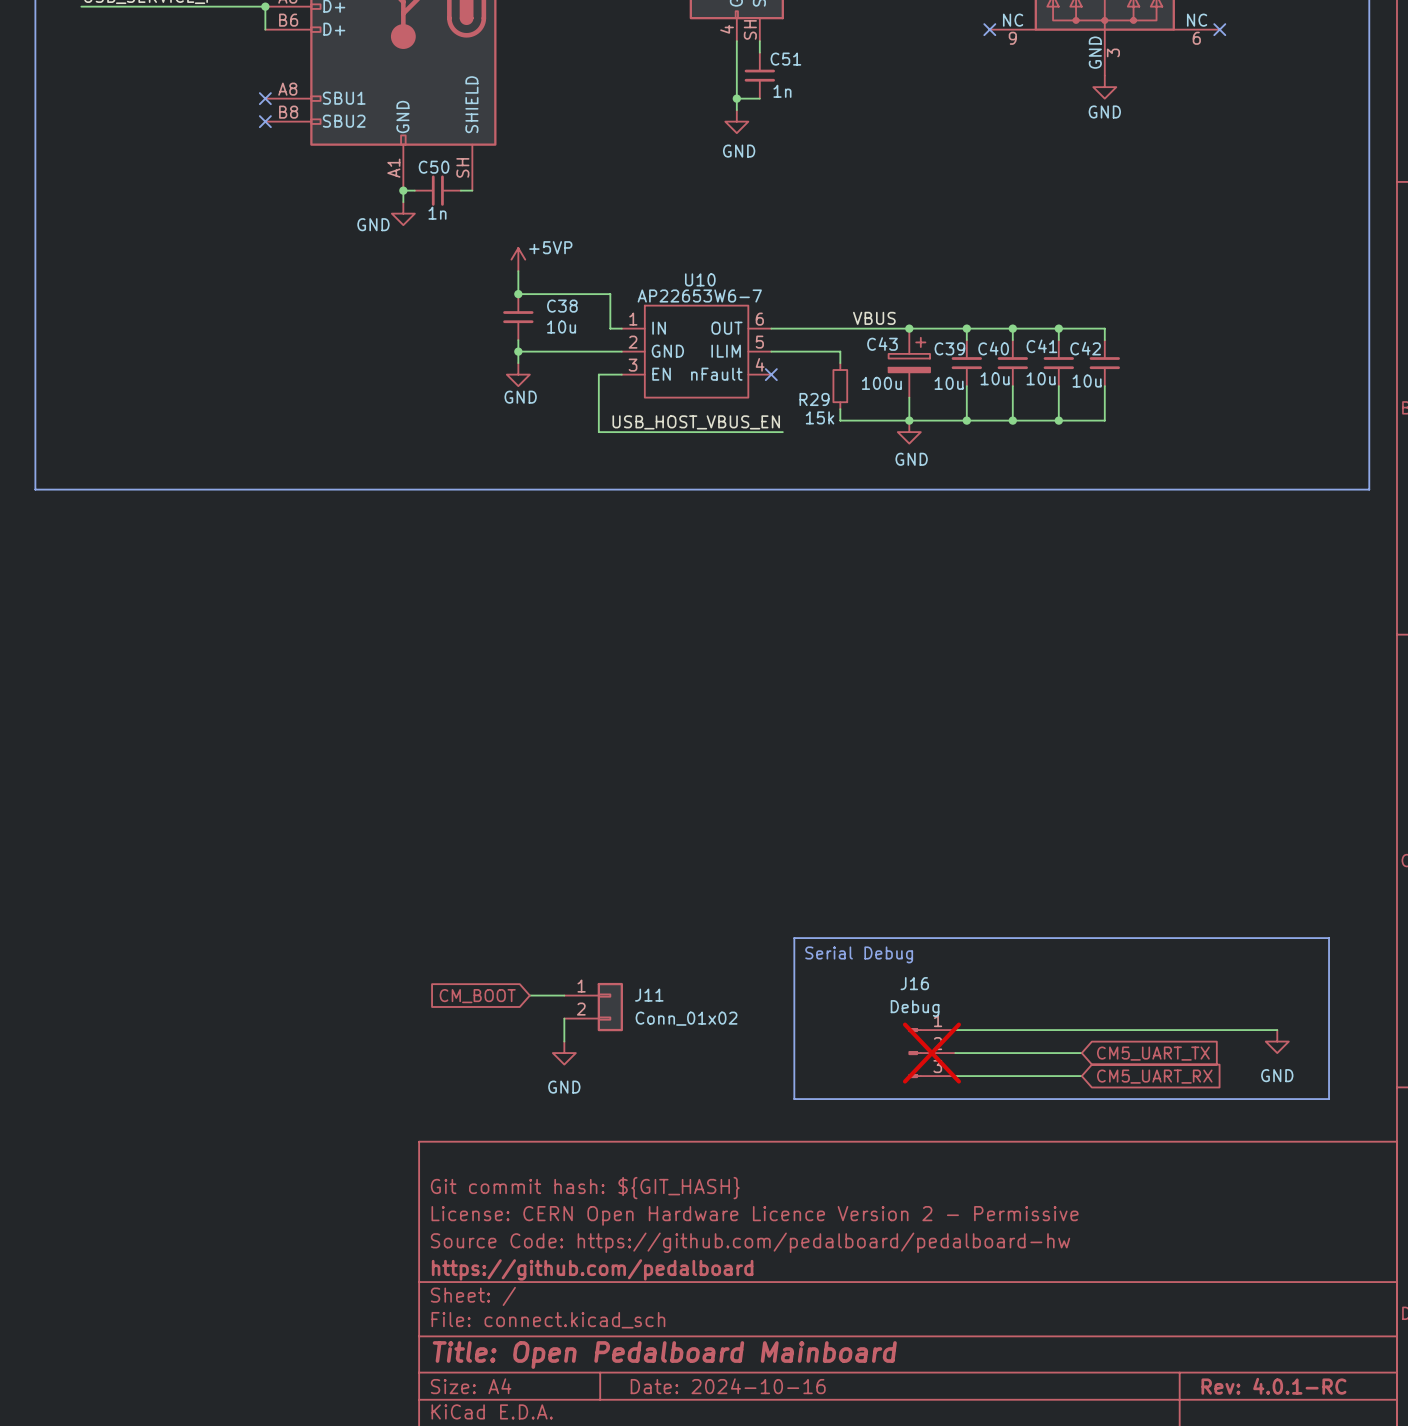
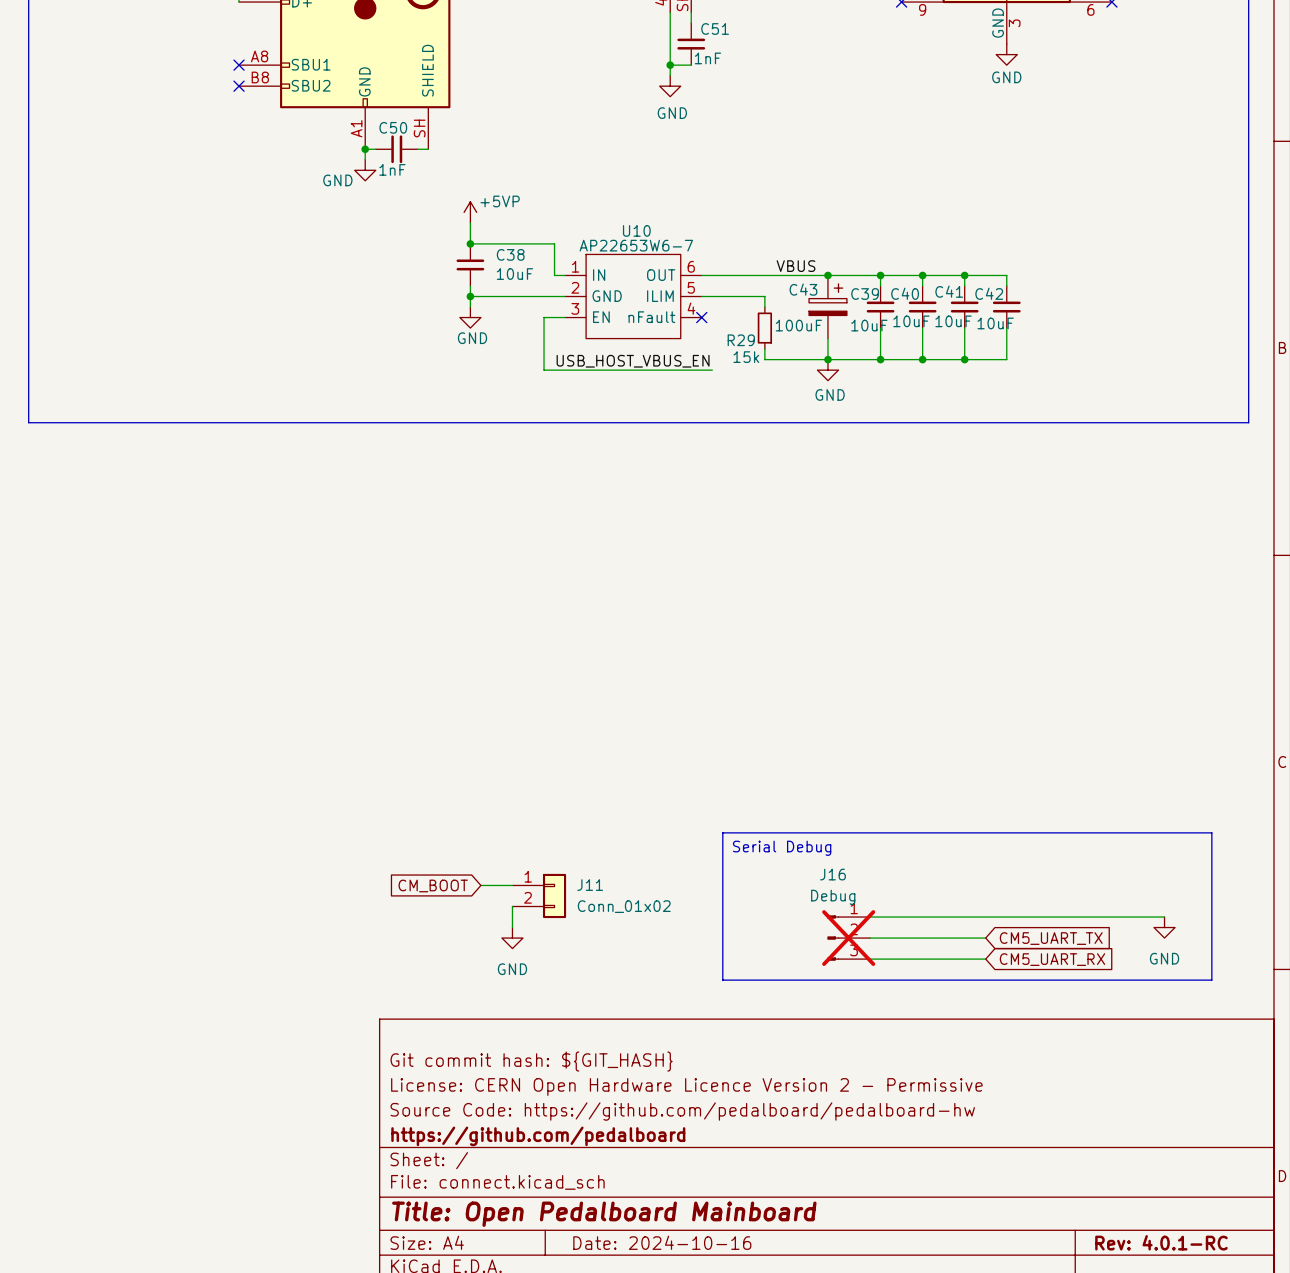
C51 value: 1n (782, 91) -> 1nF (707, 58)
C50 value: 1n (437, 213) -> 1nF (392, 169)
C38 value: 10u (561, 327) -> 10uF (514, 274)
C40 value: 10u (995, 378) -> 10uF (911, 321)
C41 value: 10u (1041, 378) -> 10uF (953, 321)
C42 value: 10u (1087, 381) -> 10uF (995, 323)
C43 value: 100u (881, 383) -> 100uF (798, 325)
C39 value: 10u (949, 383) -> 10uF (869, 325)

